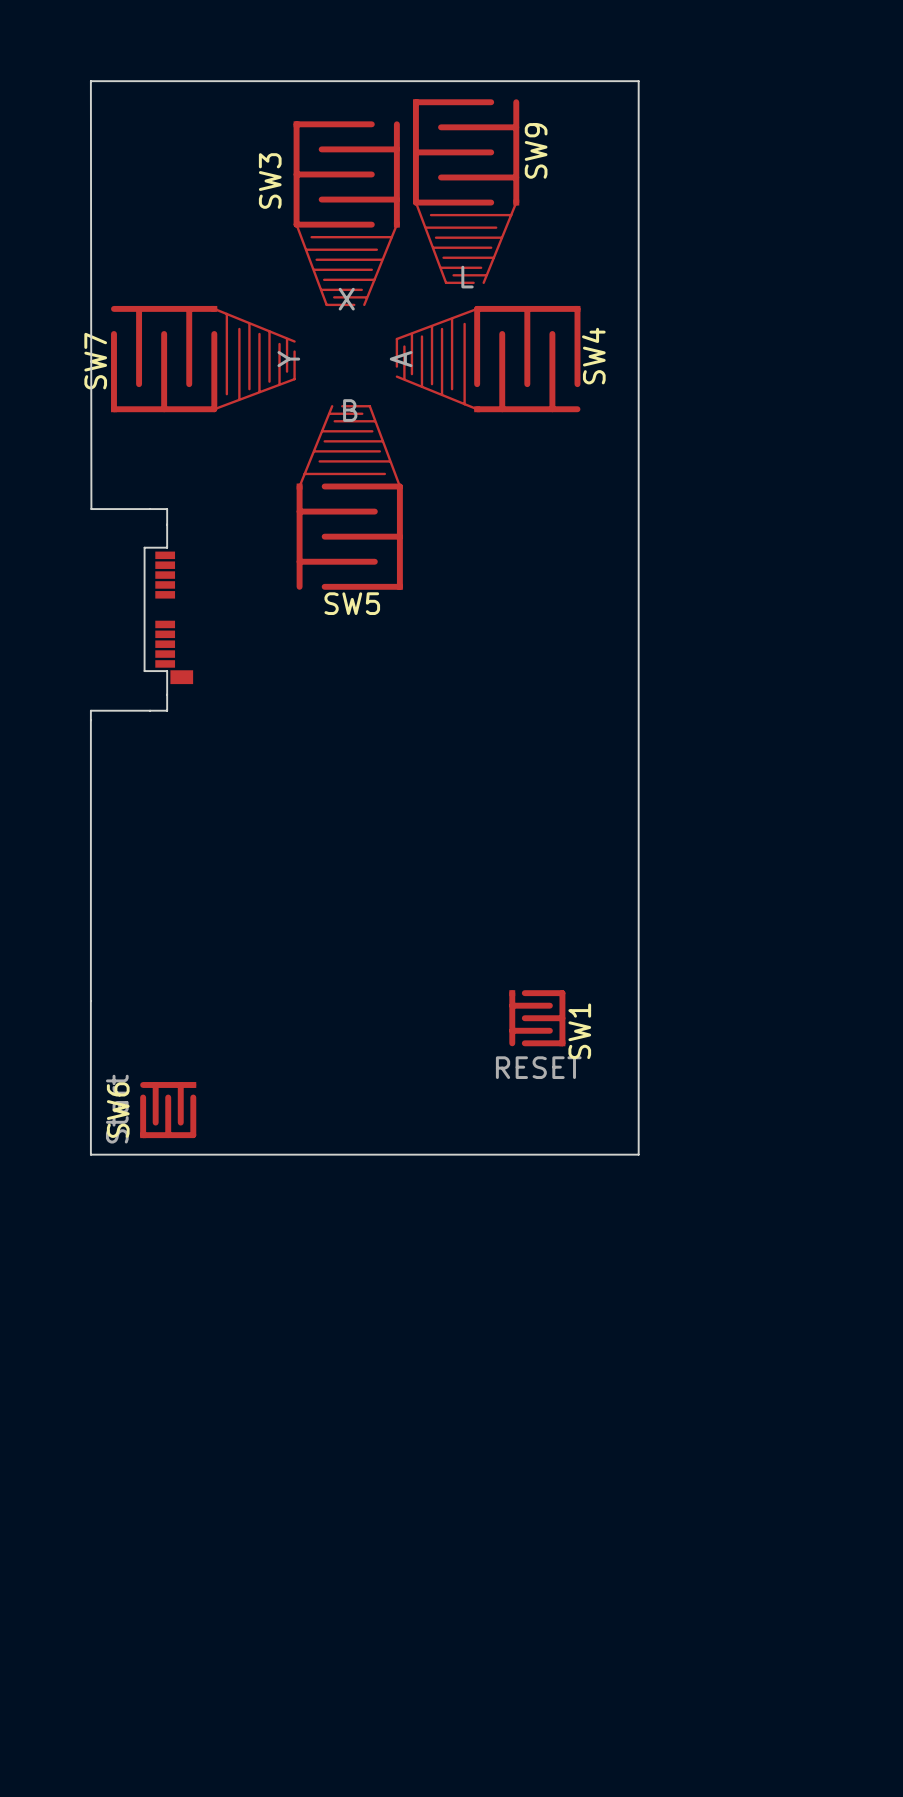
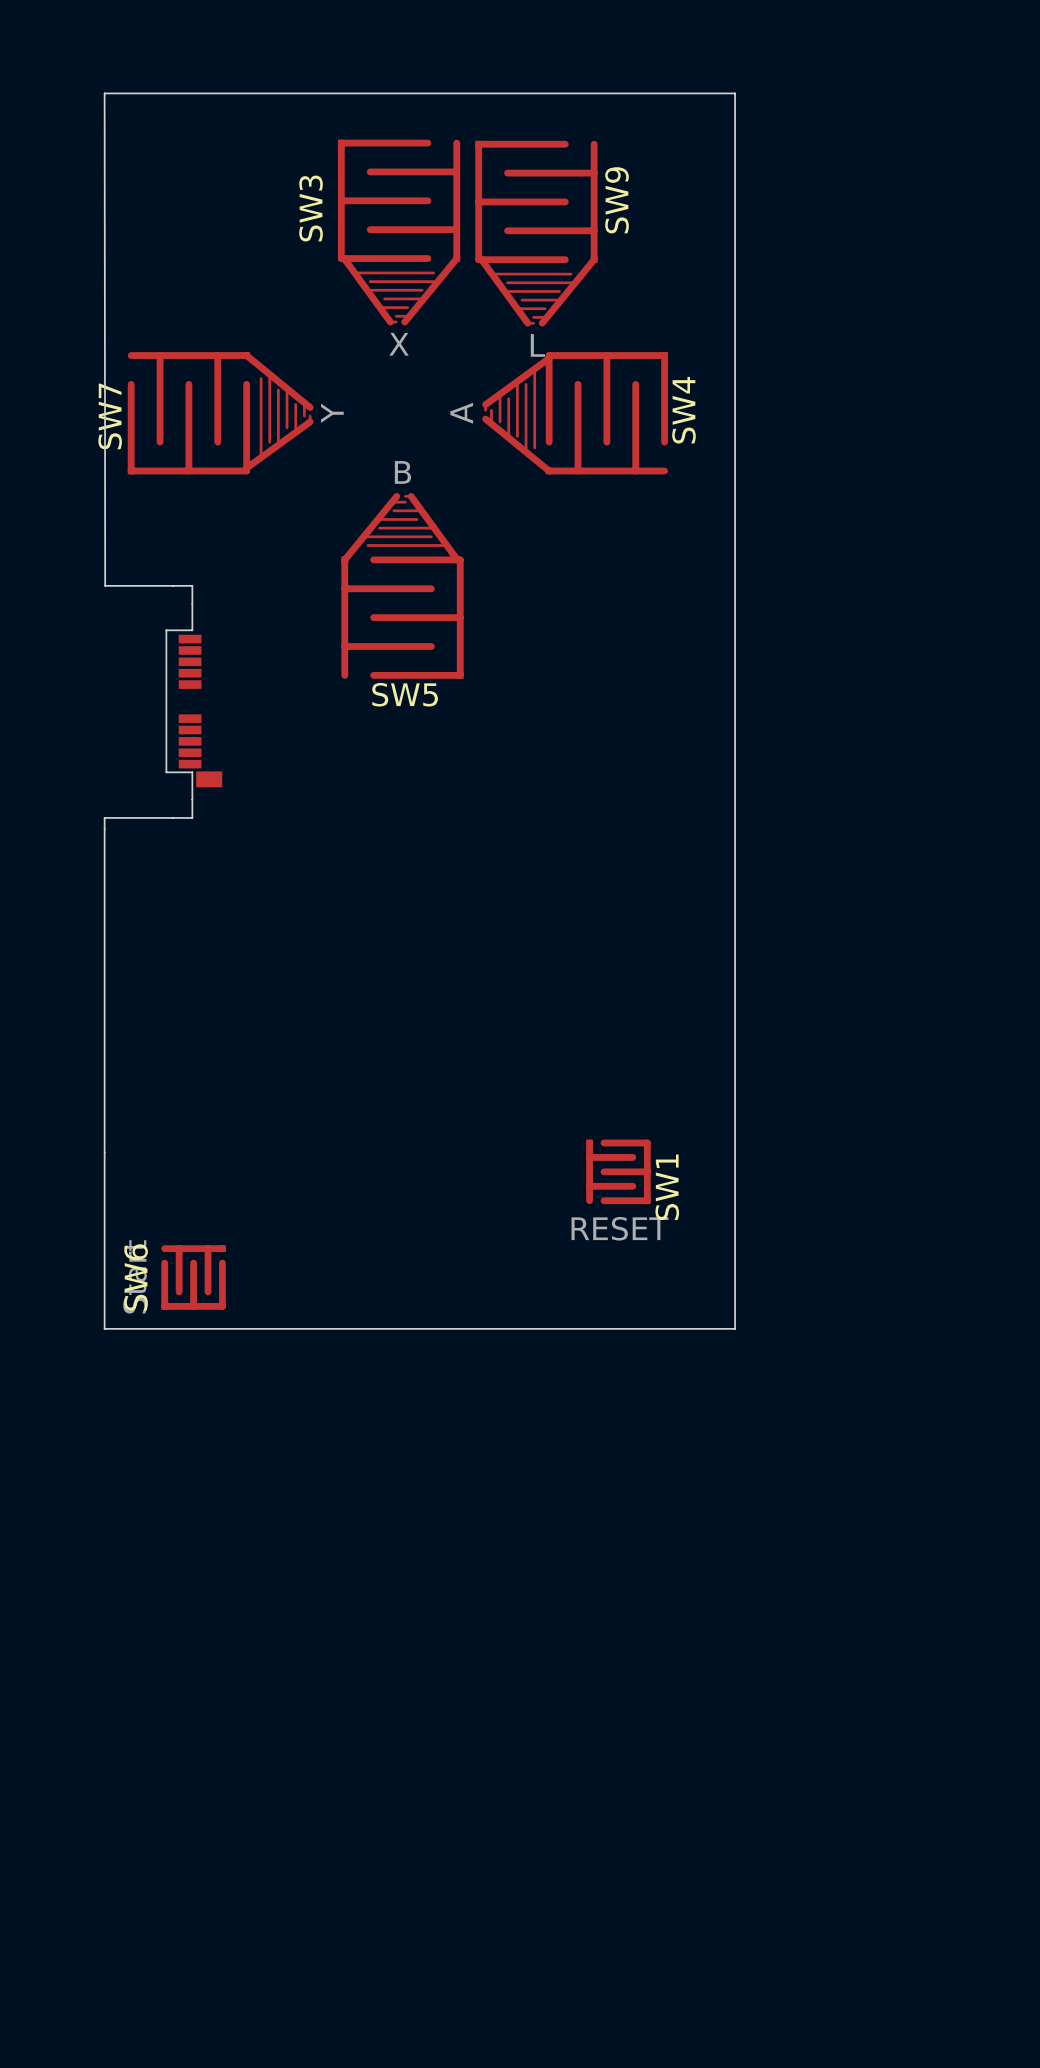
SW9 footprint: [412, 99, 520, 285] -> [475, 140, 598, 327]
SW3 footprint: [293, 121, 400, 307] -> [337, 139, 461, 326]
SW7 footprint: [111, 305, 296, 413] -> [127, 352, 314, 475]
SW4 footprint: [395, 305, 581, 413] -> [482, 352, 669, 475]
SW5 footprint: [296, 405, 403, 590] -> [341, 492, 464, 679]

